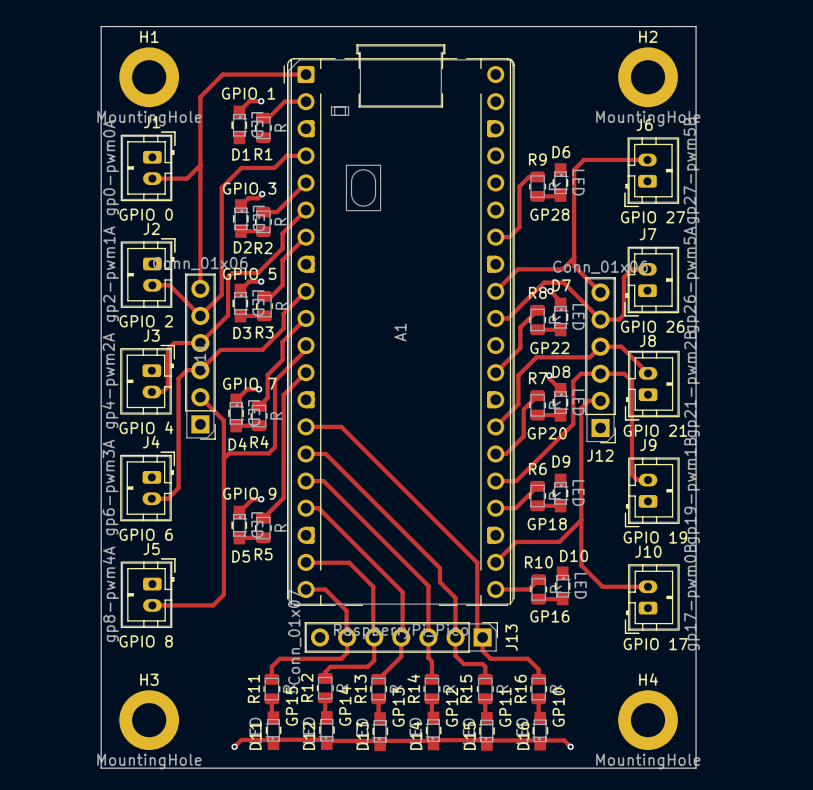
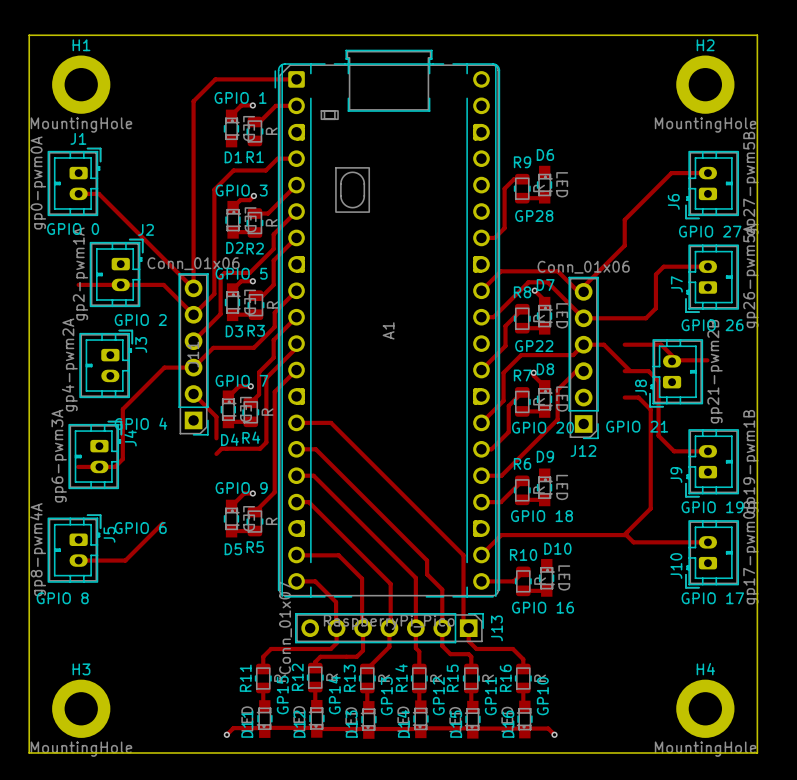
board edge: (101, 26) (696, 26) (696, 768) (101, 768) (101, 26) -> (29, 35) (29, 752) (757, 752) (757, 35) (29, 35)
H1 position: (149, 77) -> (81, 84)
H2 position: (648, 77) -> (705, 84)
J6 name rotation: 0° (644, 124) -> 90° counterclockwise (673, 201)
J6 name position: J6 (644, 124) -> J6 (673, 201)
track: (647, 159) (584, 159) (574, 169) (574, 266) (600, 292) -> none
track: (200, 165) (187, 178) (149, 178) -> none
J1 position: (148, 166) -> (74, 181)
J6 position: (651, 172) -> (712, 185)
track: none -> (78, 193) (98, 193) (193, 288)
text position: GPIO 0 (146, 214) -> GPIO 0 (73, 229)
text position: GPIO 27 (653, 217) -> GPIO 27 (710, 231)
J7 name rotation: 0° (648, 234) -> 90° counterclockwise (676, 284)
J7 name position: J7 (648, 234) -> J7 (676, 284)
track: (574, 257) (562, 269) (517, 269) (515, 271) -> (707, 173) (671, 173) (624, 219) (624, 245) (578, 291) (557, 271) (500, 271)
track: (647, 269) (632, 269) (624, 277) (624, 314) (619, 319) -> (707, 266) (663, 266) (655, 274) (655, 308) (645, 318) (601, 318)
J2 position: (148, 273) -> (116, 272)
J7 position: (651, 281) -> (712, 278)
track: none -> (78, 284) (146, 284)
text position: GPIO 26 (652, 326) -> GPIO 26 (712, 325)
J3 name rotation: 0° (151, 335) -> 90° counterclockwise (141, 344)
J8 name rotation: 0° (647, 340) -> 90° counterclockwise (640, 387)
J8 name position: J8 (647, 340) -> J8 (640, 387)
track: (200, 343) (174, 343) (167, 349) (167, 386) (162, 392) (151, 392) -> none
track: none -> (624, 344) (661, 344) (676, 360) (707, 360)
track: (187, 370) (178, 378) (178, 488) (167, 498) (151, 498) -> (180, 367) (164, 367) (122, 409) (122, 459) (115, 466) (78, 466)
track: none -> (624, 371) (648, 371) (658, 381) (658, 435) (674, 451) (707, 451) (705, 449)
J3 position: (147, 379) -> (106, 363)
J8 position: (652, 385) -> (676, 373)
track: (600, 400) (588, 400) (581, 408) (581, 565) (602, 586) (648, 586) -> none
track: none -> (624, 397) (638, 397) (650, 409) (650, 508) (624, 535)
track: (573, 424) (573, 381) (580, 373) (624, 373) (632, 381) (632, 474) (637, 480) (648, 480) -> (557, 420) (557, 389) (576, 371)
text: GP20 (547, 433) -> GPIO 20 (543, 427)
J4 name rotation: 0° (151, 442) -> 90° counterclockwise (130, 438)
track: (223, 442) (223, 594) (213, 605) (152, 605) -> none
J9 name rotation: 0° (648, 444) -> 90° counterclockwise (676, 474)
J9 name position: J9 (648, 444) -> J9 (676, 474)
J4 position: (147, 486) -> (95, 454)
J9 position: (652, 492) -> (712, 463)
track: (581, 520) (559, 541) -> (707, 542) (633, 542) (626, 535) (543, 535)
text: GP18 (547, 524) -> GPIO 18 (541, 516)
track: none -> (162, 523) (125, 560) (78, 560)
text position: GPIO 19 (655, 537) -> GPIO 19 (712, 507)
J5 name rotation: 0° (151, 549) -> 90° counterclockwise (109, 534)
J5 name position: J5 (151, 549) -> J5 (109, 534)
J10 name rotation: 0° (648, 551) -> 90° counterclockwise (676, 566)
J10 name position: J10 (648, 551) -> J10 (676, 566)
J5 position: (148, 593) -> (74, 548)
J10 position: (652, 599) -> (712, 554)
text: GP16 (549, 616) -> GPIO 16 (543, 607)
text position: GPIO 8 (146, 641) -> GPIO 8 (62, 598)
text position: GPIO 17 (655, 644) -> GPIO 17 (712, 598)
H3 position: (149, 720) -> (81, 708)
H4 position: (648, 720) -> (705, 708)

